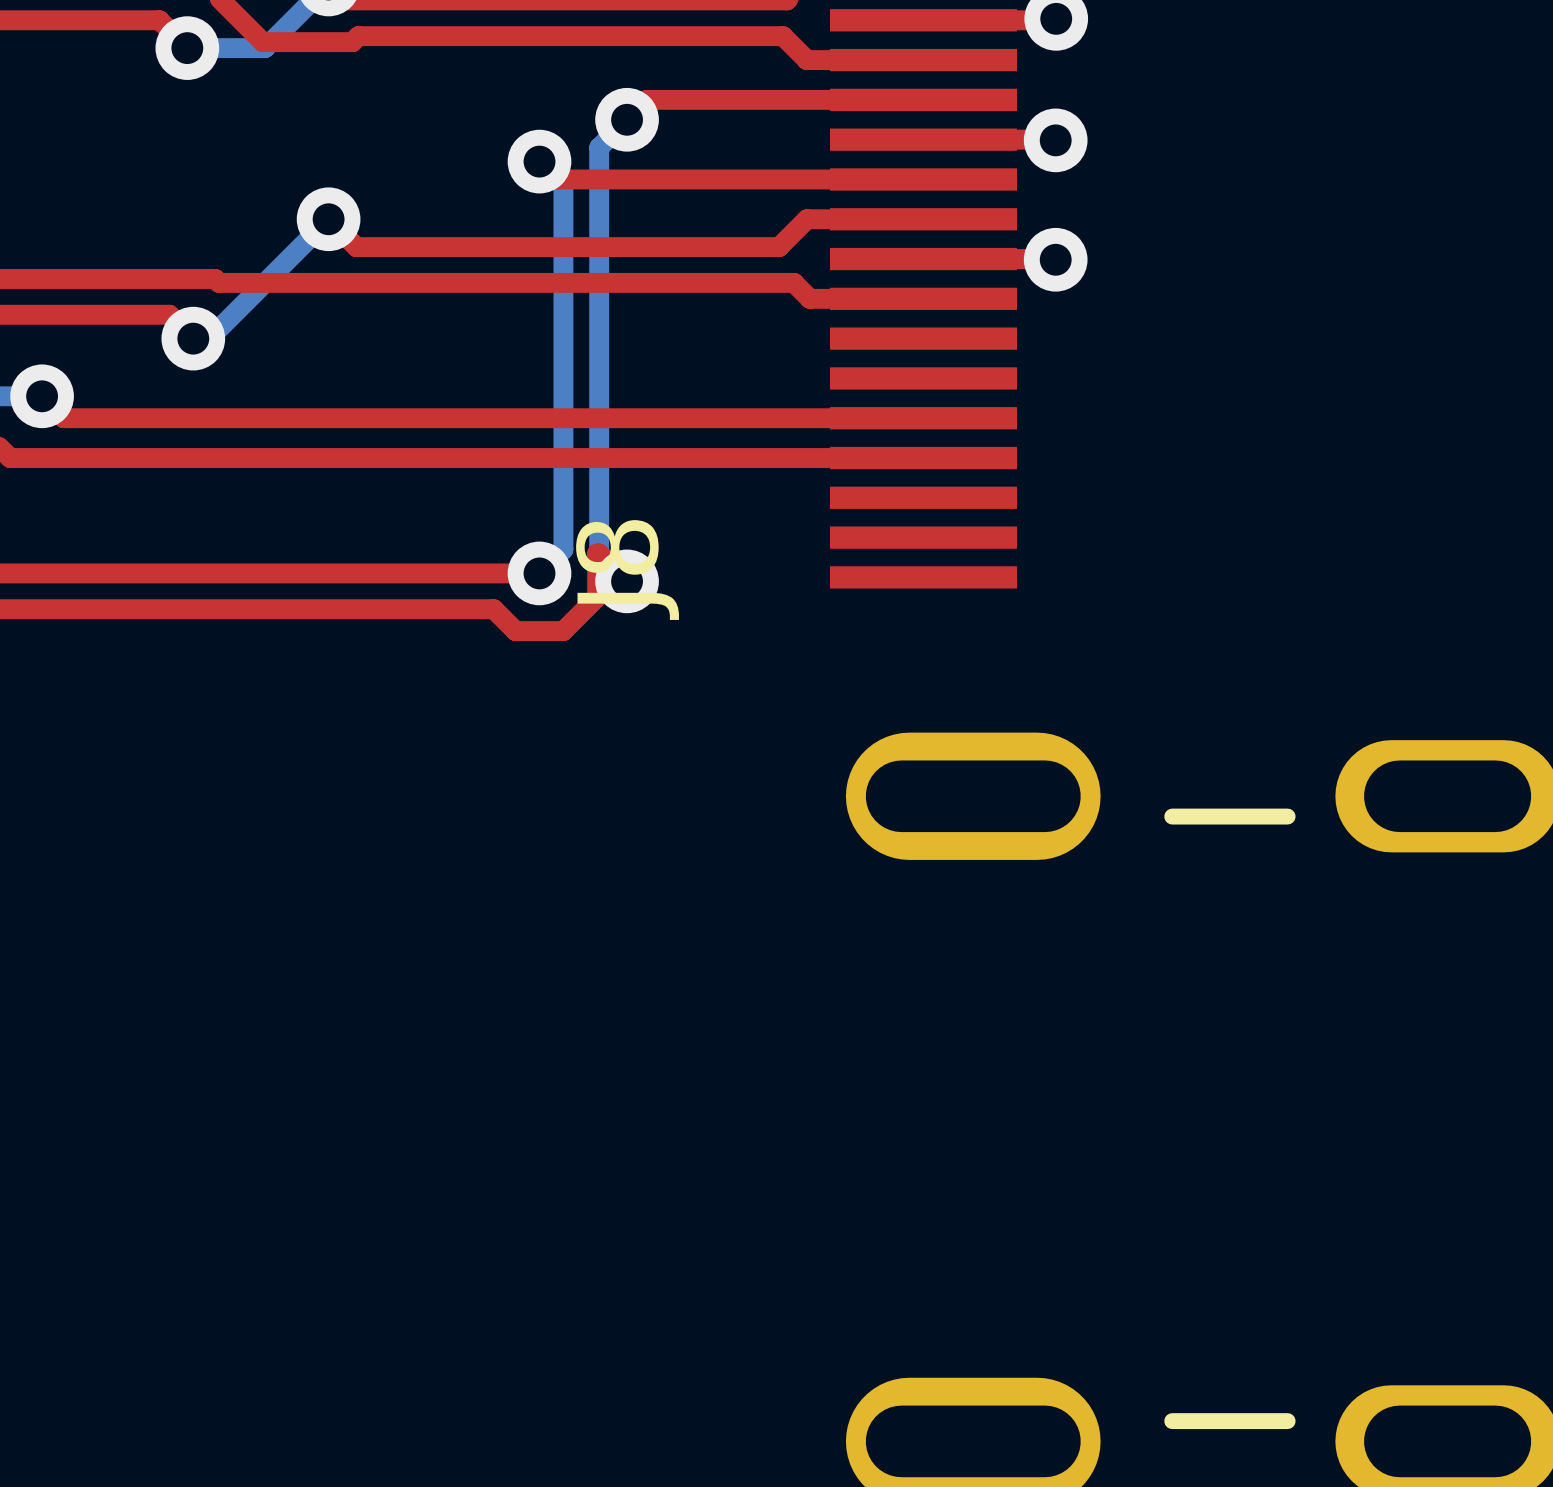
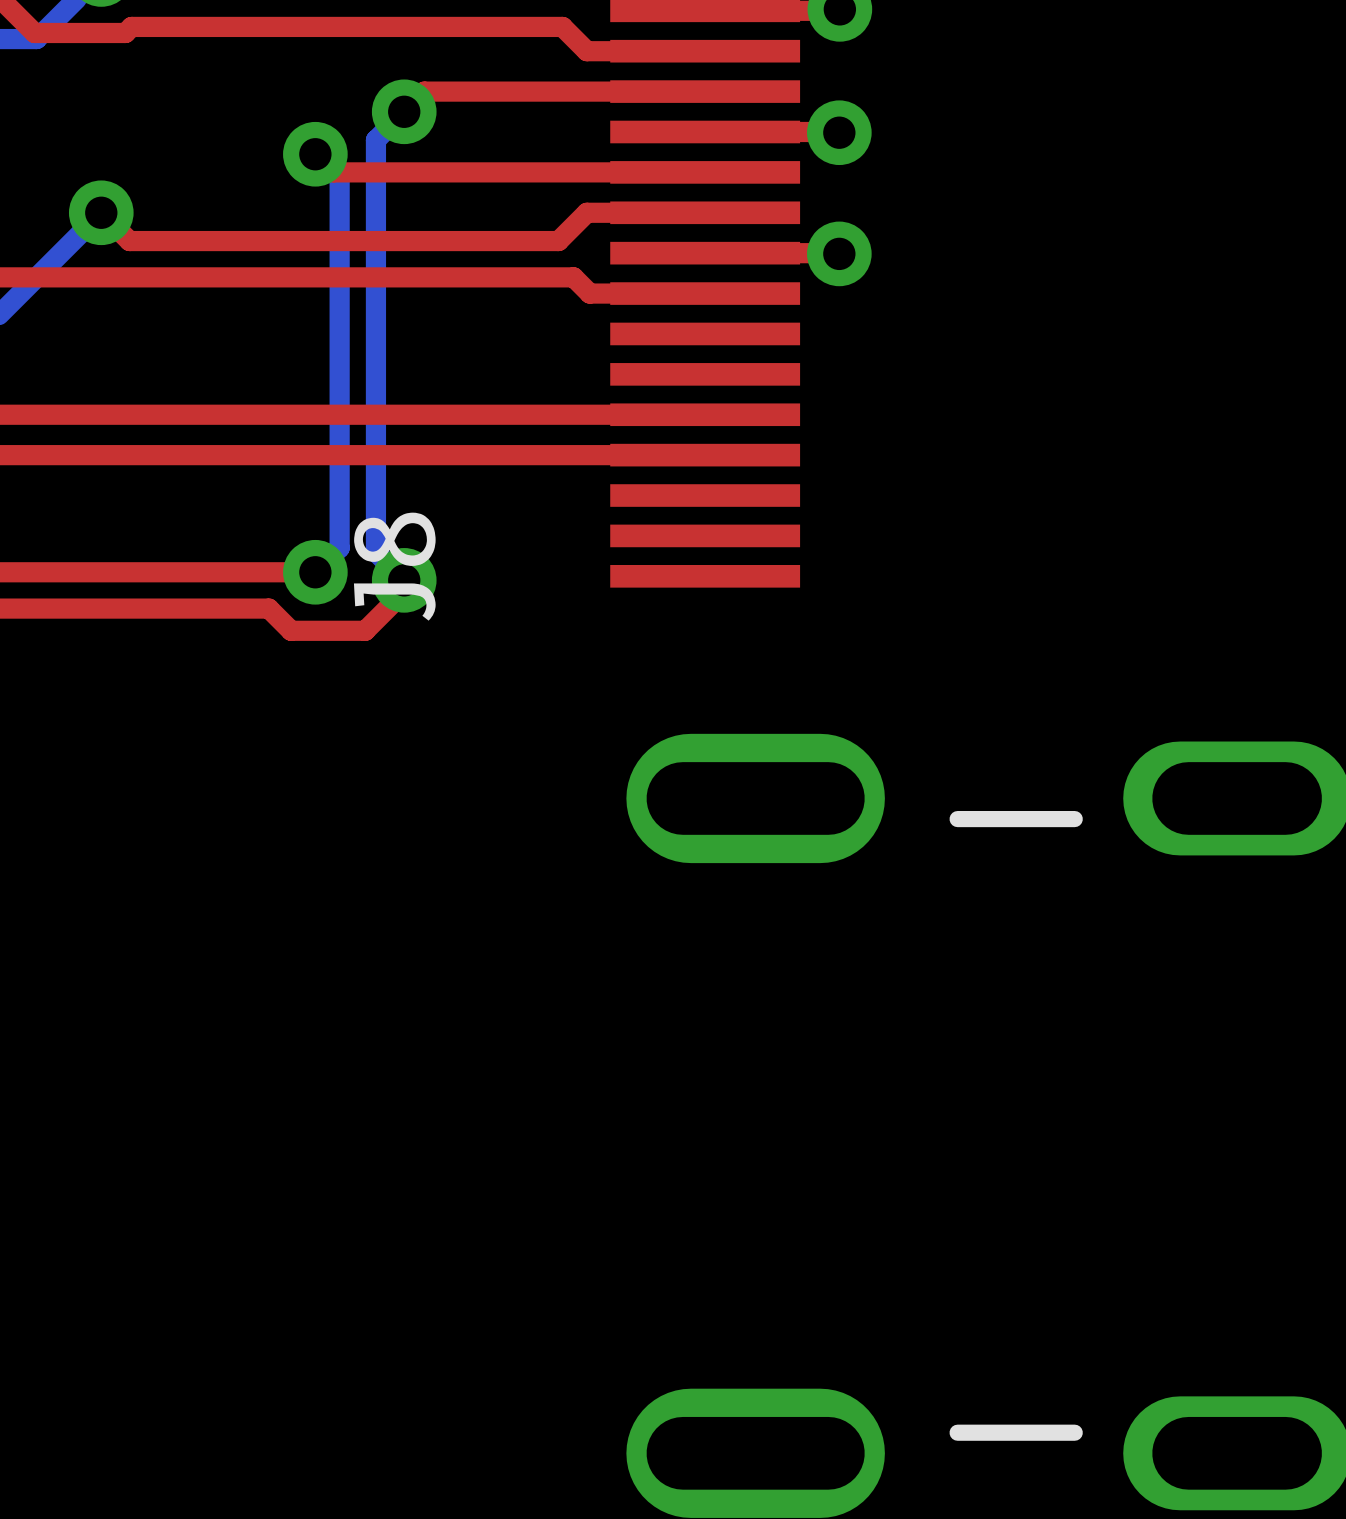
top track: (627, 581) (597, 553) (597, 597) (563, 631) -> (404, 580) (404, 591) (365, 630) (339, 630)

